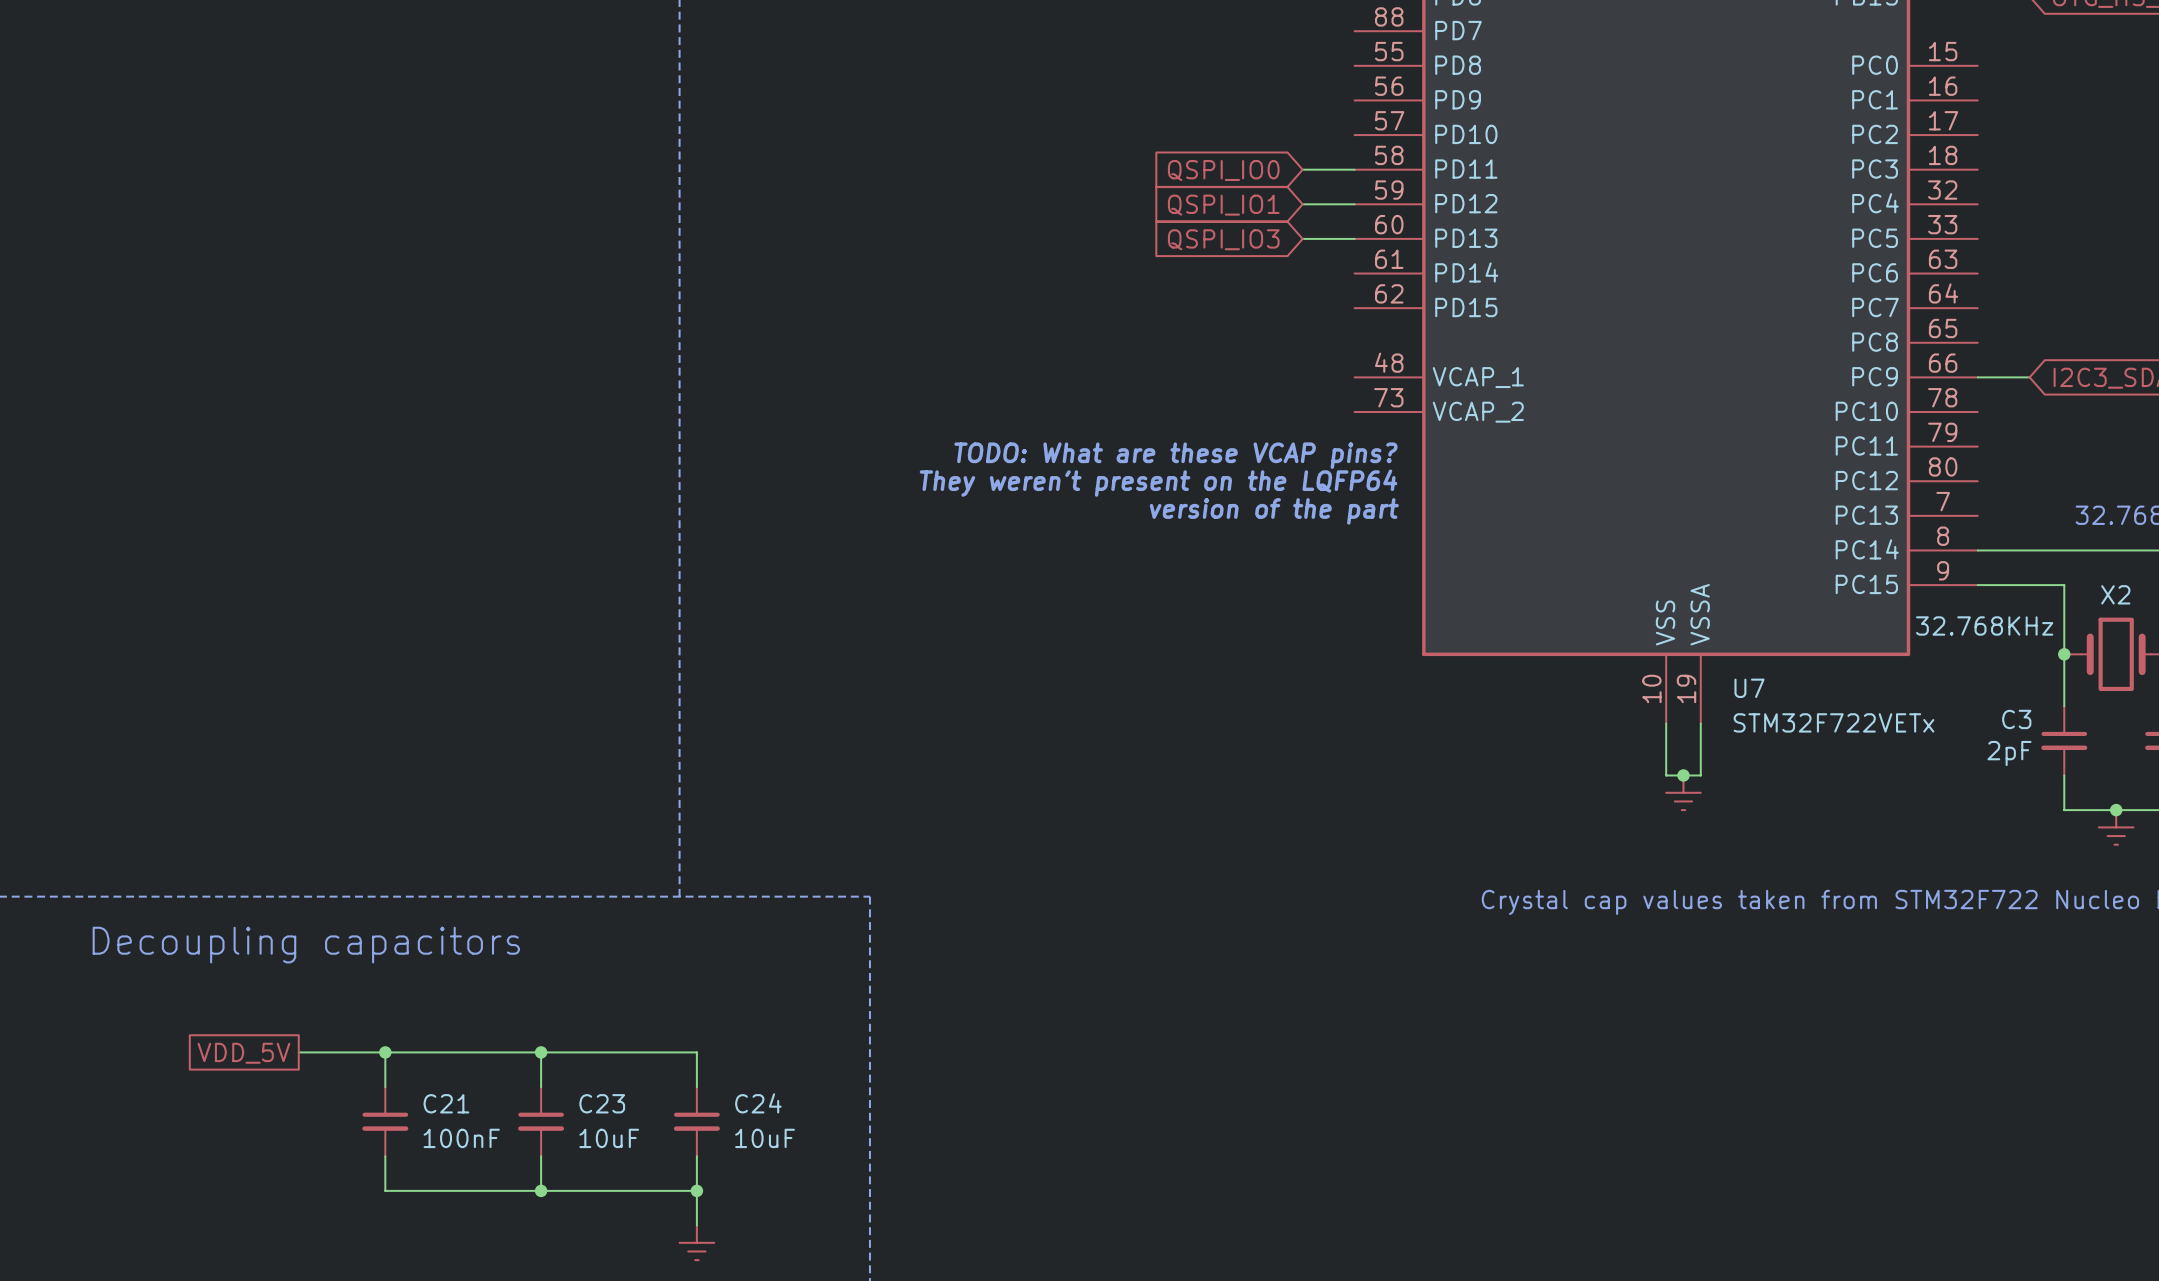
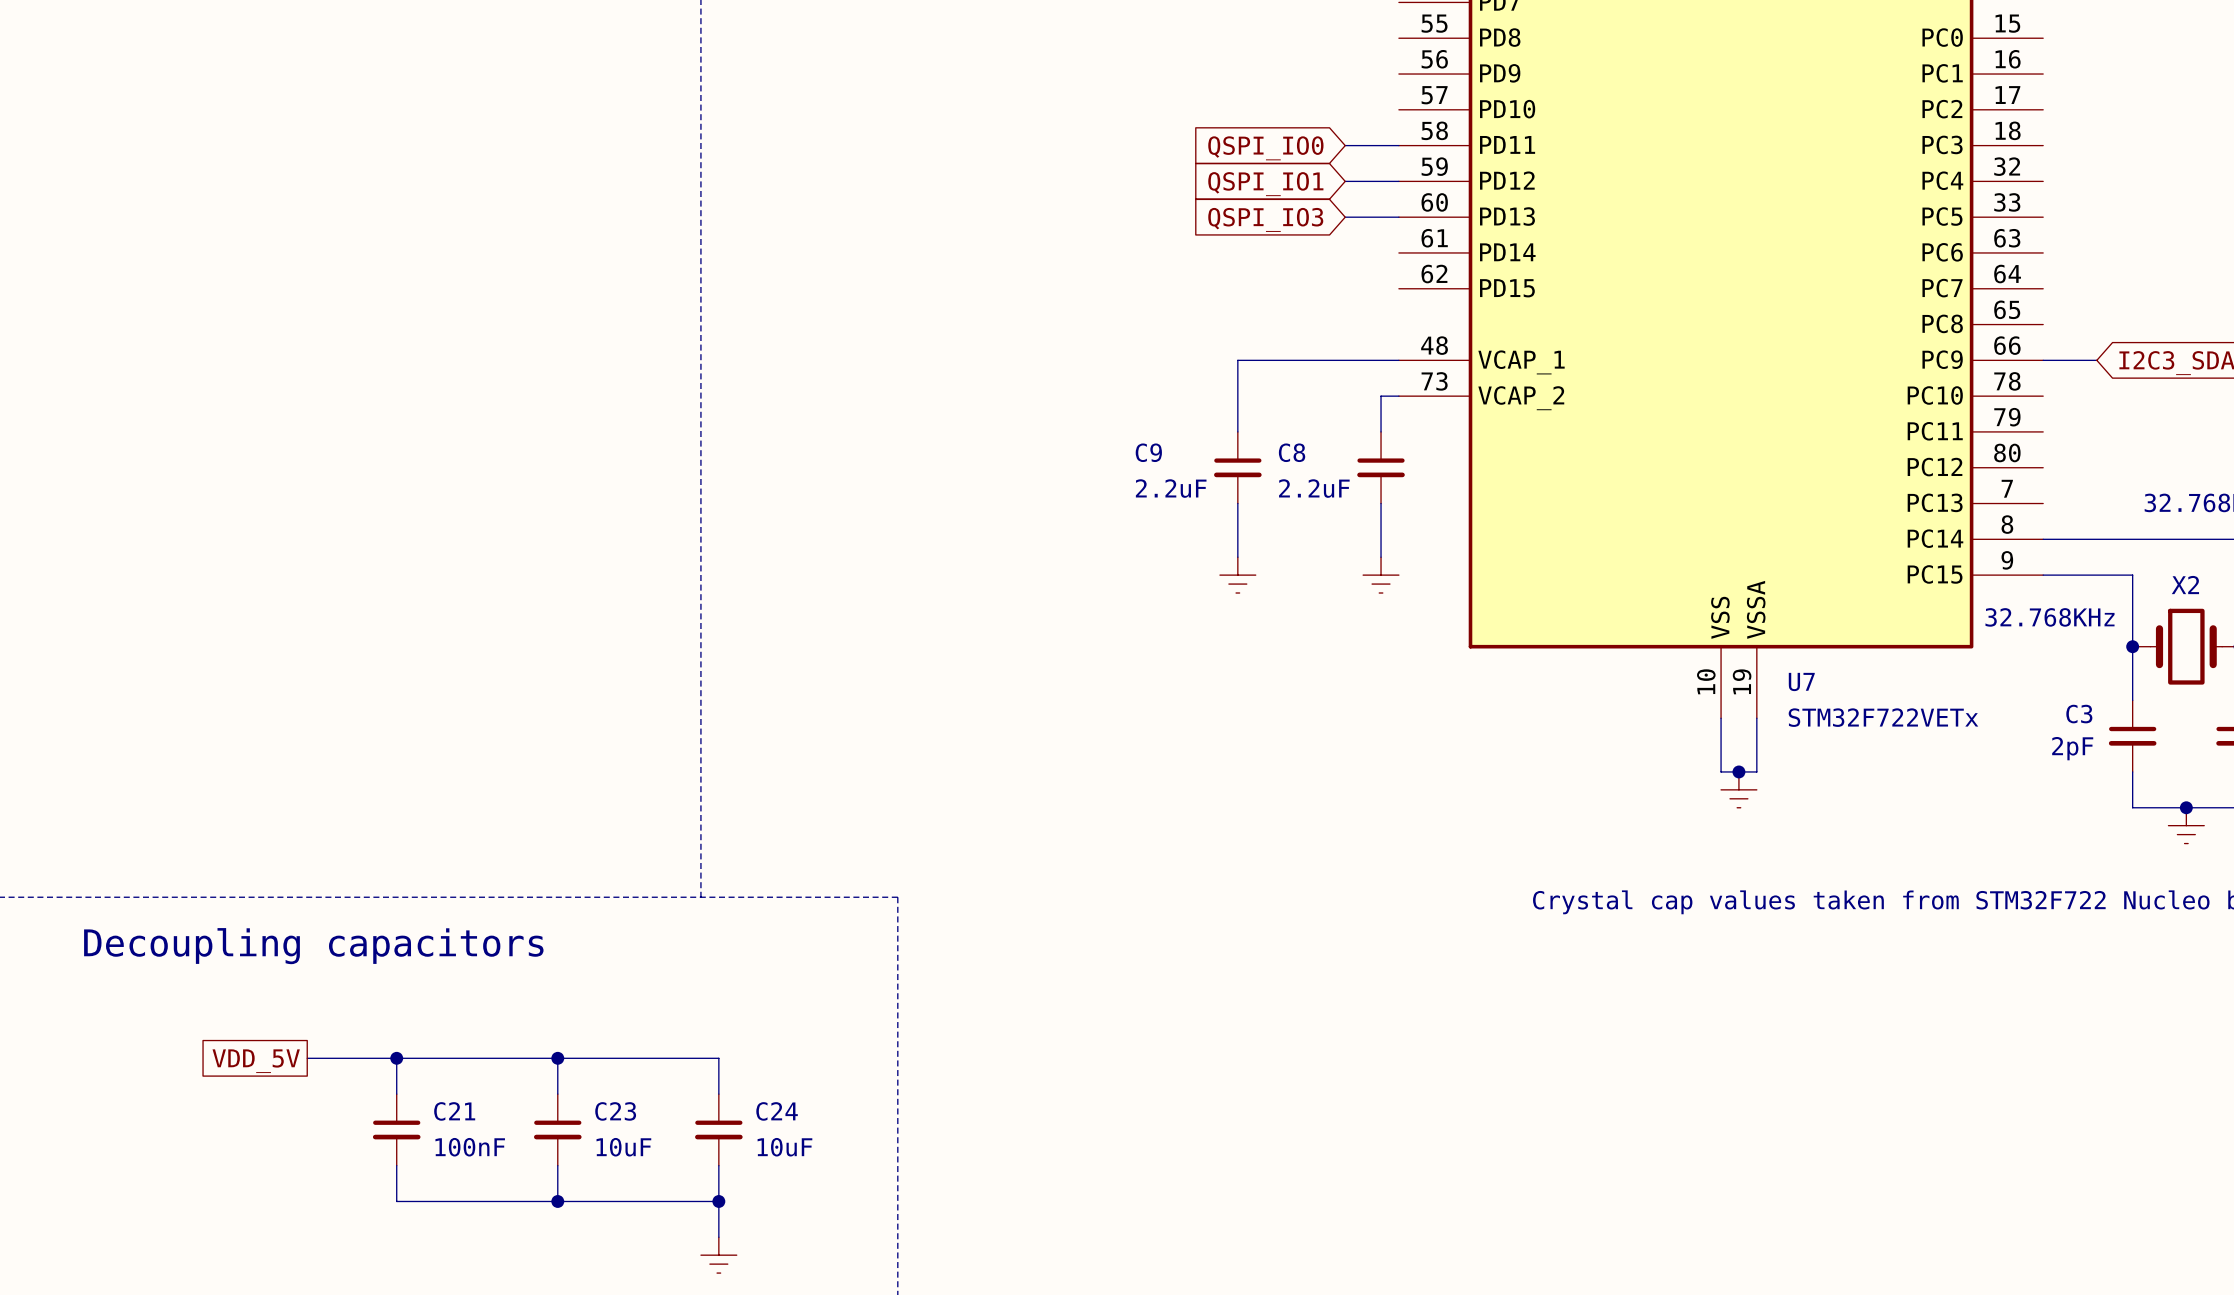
wire: none -> (1398, 360) (1237, 360) (1237, 431)
wire: none -> (1398, 396) (1381, 396) (1381, 431)
text: TODO: What are these VCAP pins? (1175, 455) -> none
C9: none -> 2.2uF (1237, 467)
C8: none -> 2.2uF (1381, 467)
text: They weren't present on the LQFP64 (1158, 483) -> none
text: version of the part (1274, 511) -> none
wire: none -> (1237, 503) (1237, 557)
wire: none -> (1381, 503) (1381, 557)
power symbol: none -> (1237, 575)
power symbol: none -> (1381, 575)

